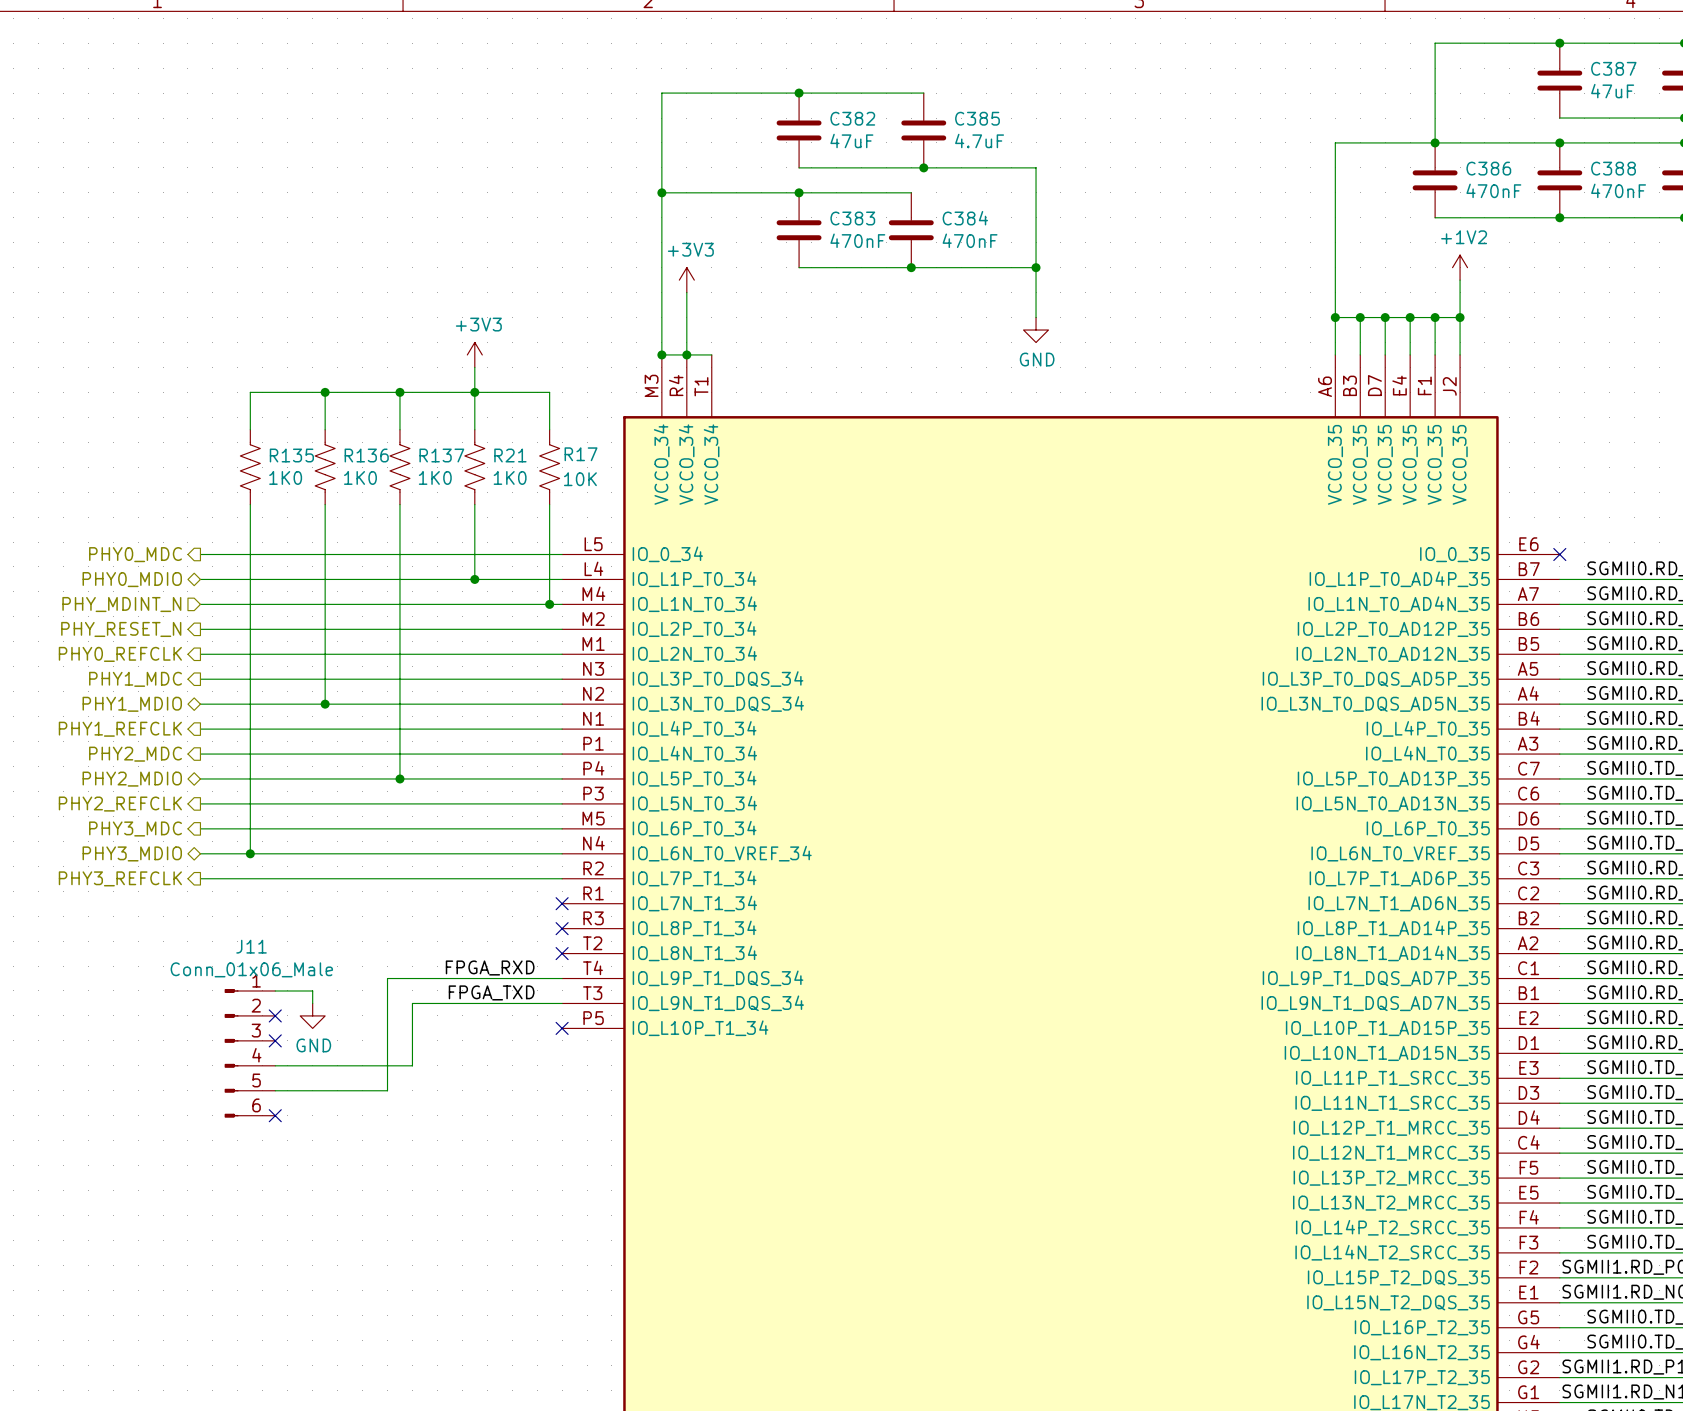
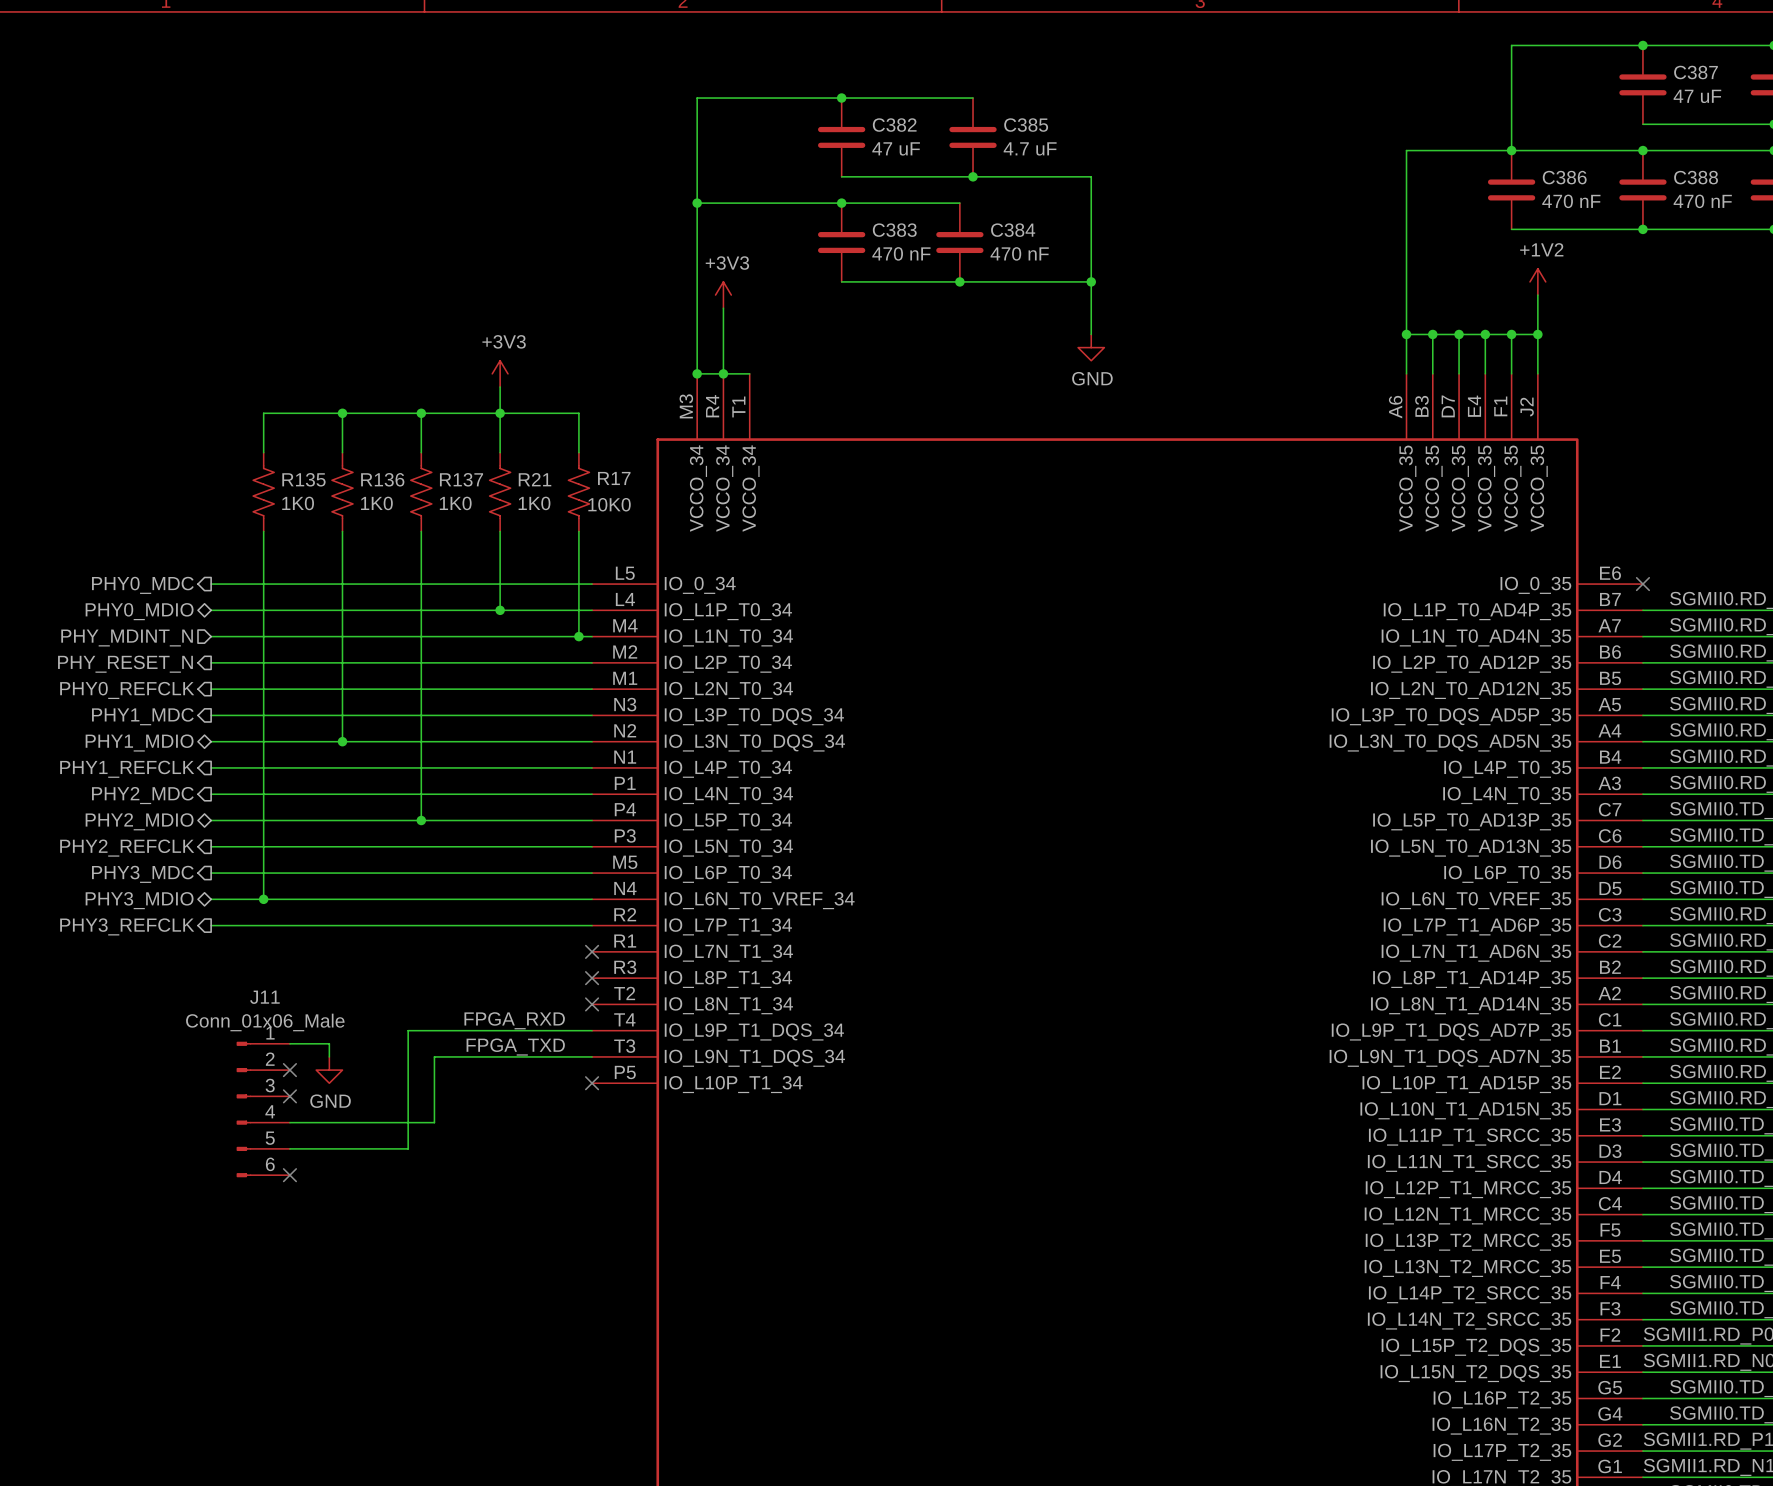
C387 value: 47uF (1612, 91) -> 47 uF (1697, 96)
C382 value: 47uF (851, 141) -> 47 uF (896, 148)
C385 value: 4.7uF (979, 141) -> 4.7 uF (1030, 148)
C386 value: 470nF (1493, 190) -> 470 nF (1571, 201)
C388 value: 470nF (1618, 190) -> 470 nF (1702, 201)
C383 value: 470nF (857, 240) -> 470 nF (901, 253)
C384 value: 470nF (970, 240) -> 470 nF (1019, 253)
R17 value: 10K (580, 479) -> 10K0 (609, 504)

